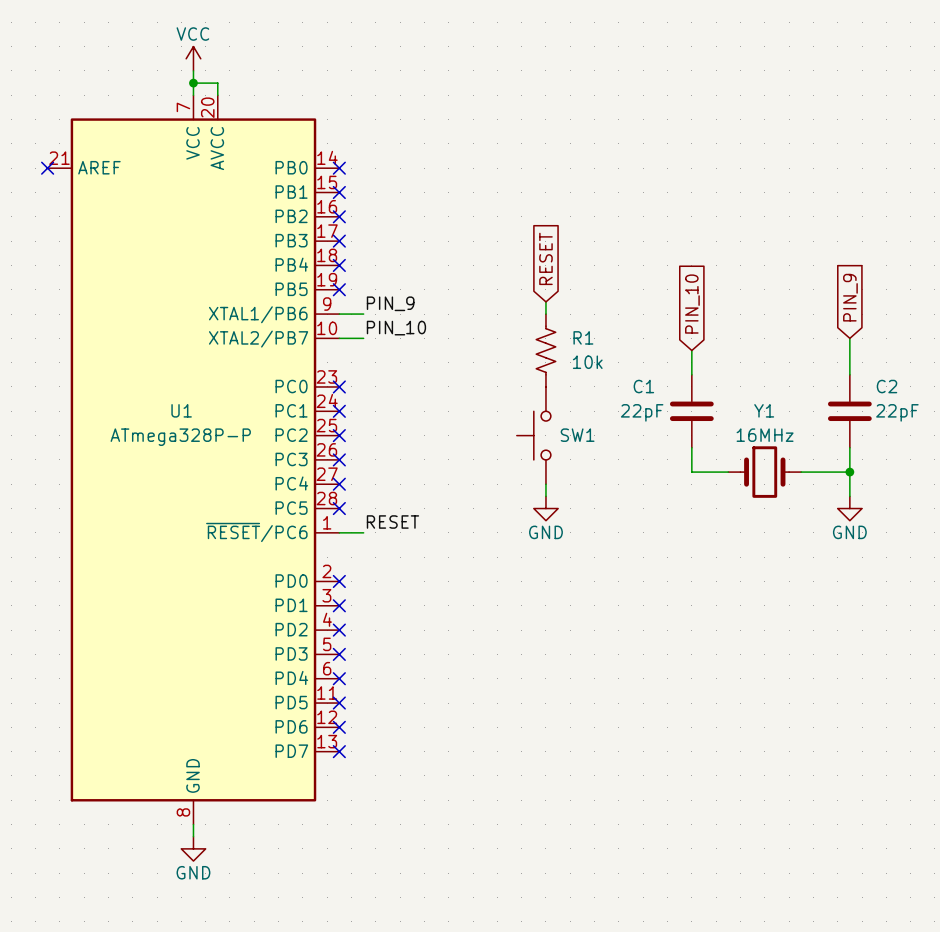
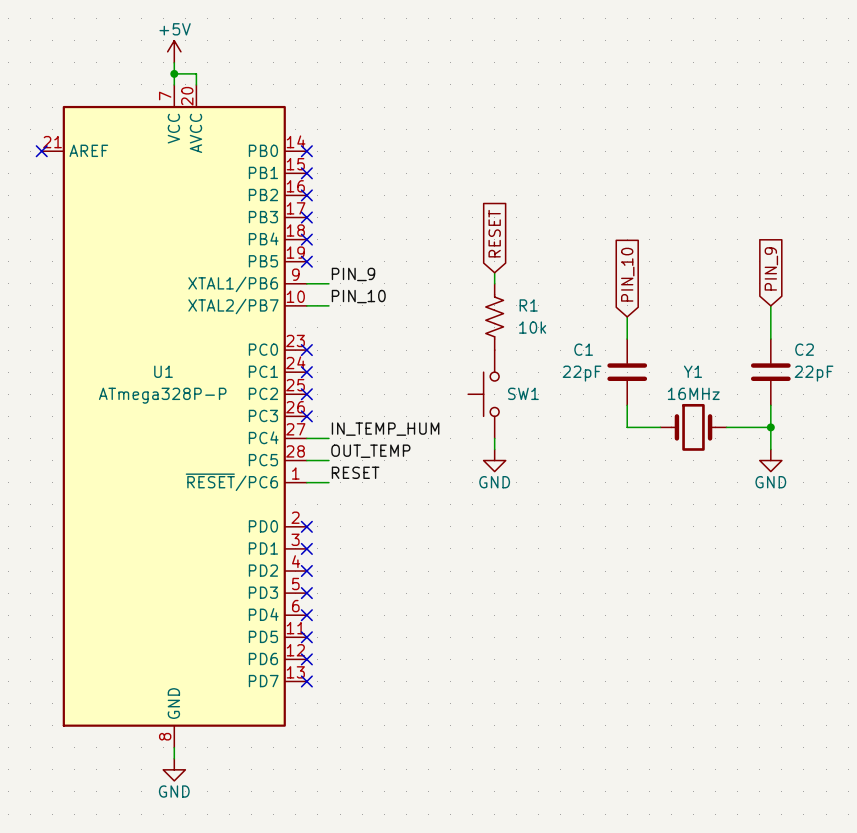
power symbol: VCC (193, 58) -> +5V (174, 51)
label: none -> IN_TEMP_HUM (385, 429)
wire: none -> (306, 438) (328, 438)
no-connect mark: (339, 484) -> none
label: none -> OUT_TEMP (370, 451)
wire: none -> (306, 460) (328, 460)
no-connect mark: (339, 508) -> none

